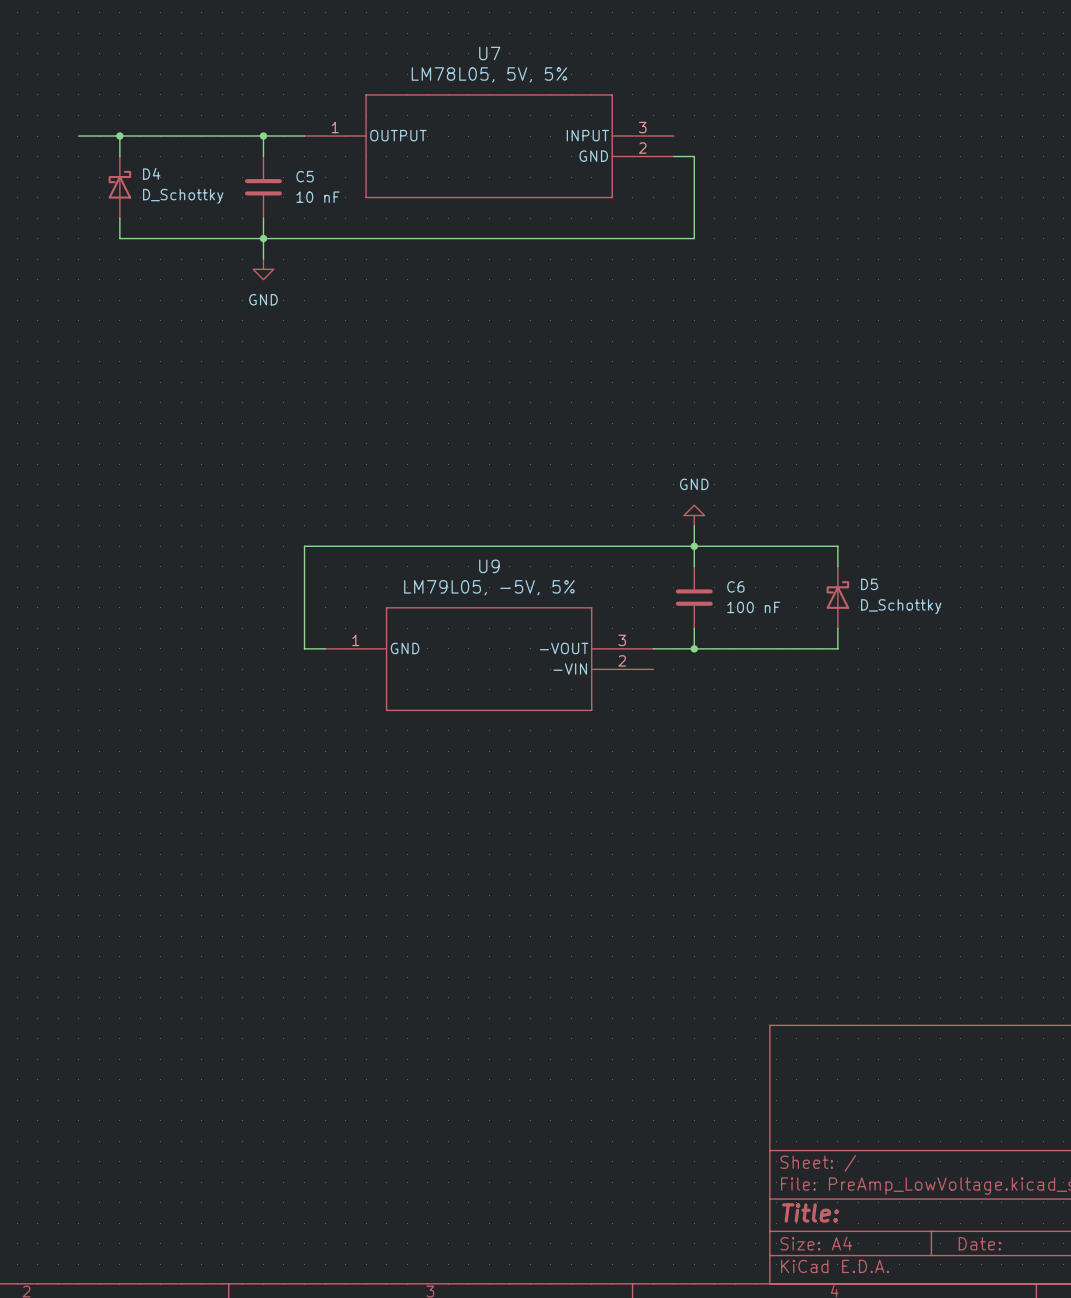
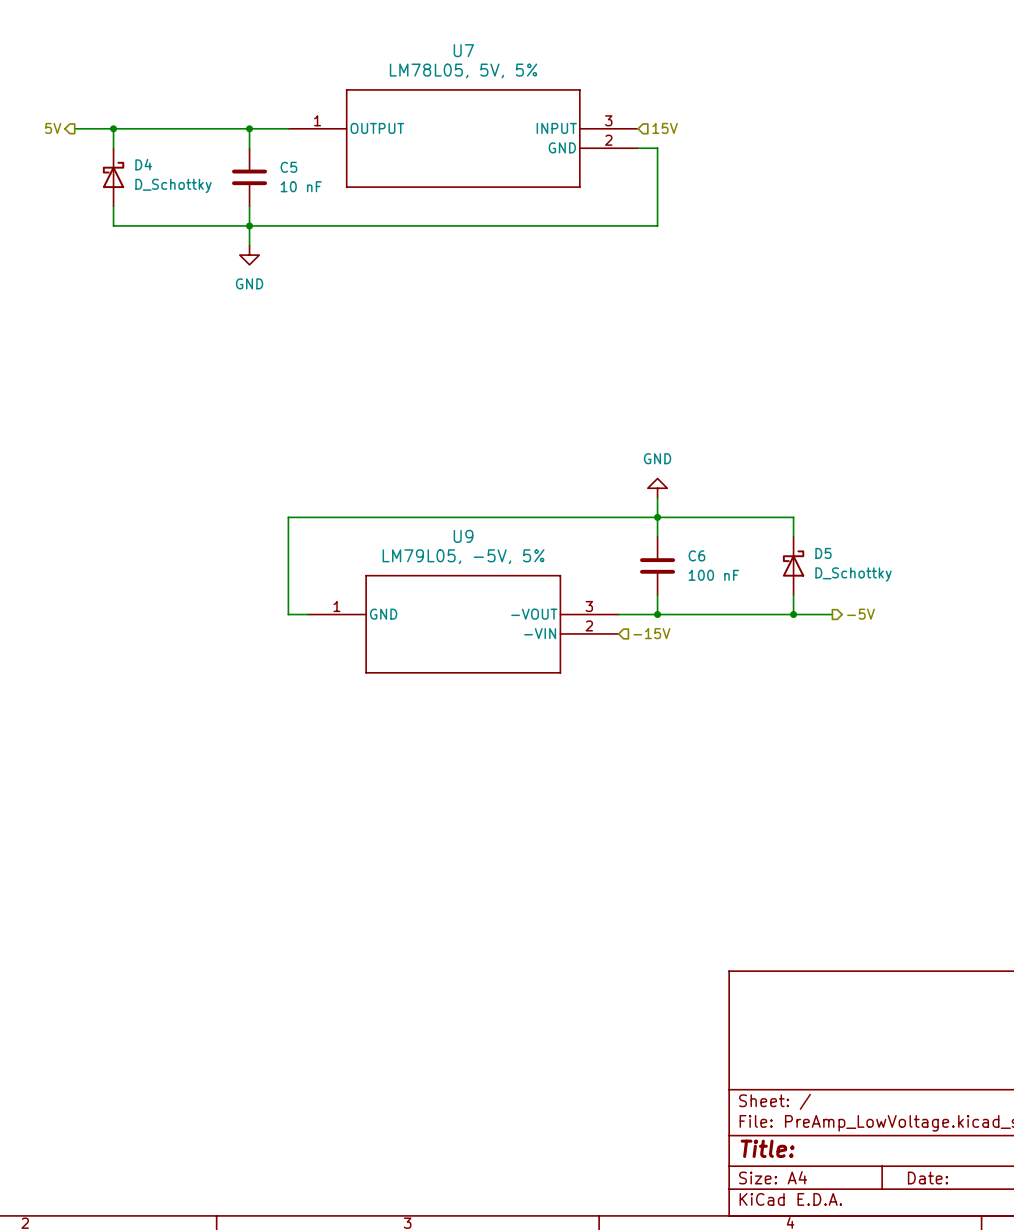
hierarchical label: none -> 5V (53, 128)
hierarchical label: none -> 15V (665, 128)
wire: none -> (793, 614) (832, 614)
junction: none -> (793, 614)
hierarchical label: none -> -5V (861, 614)
hierarchical label: none -> -15V (651, 633)

